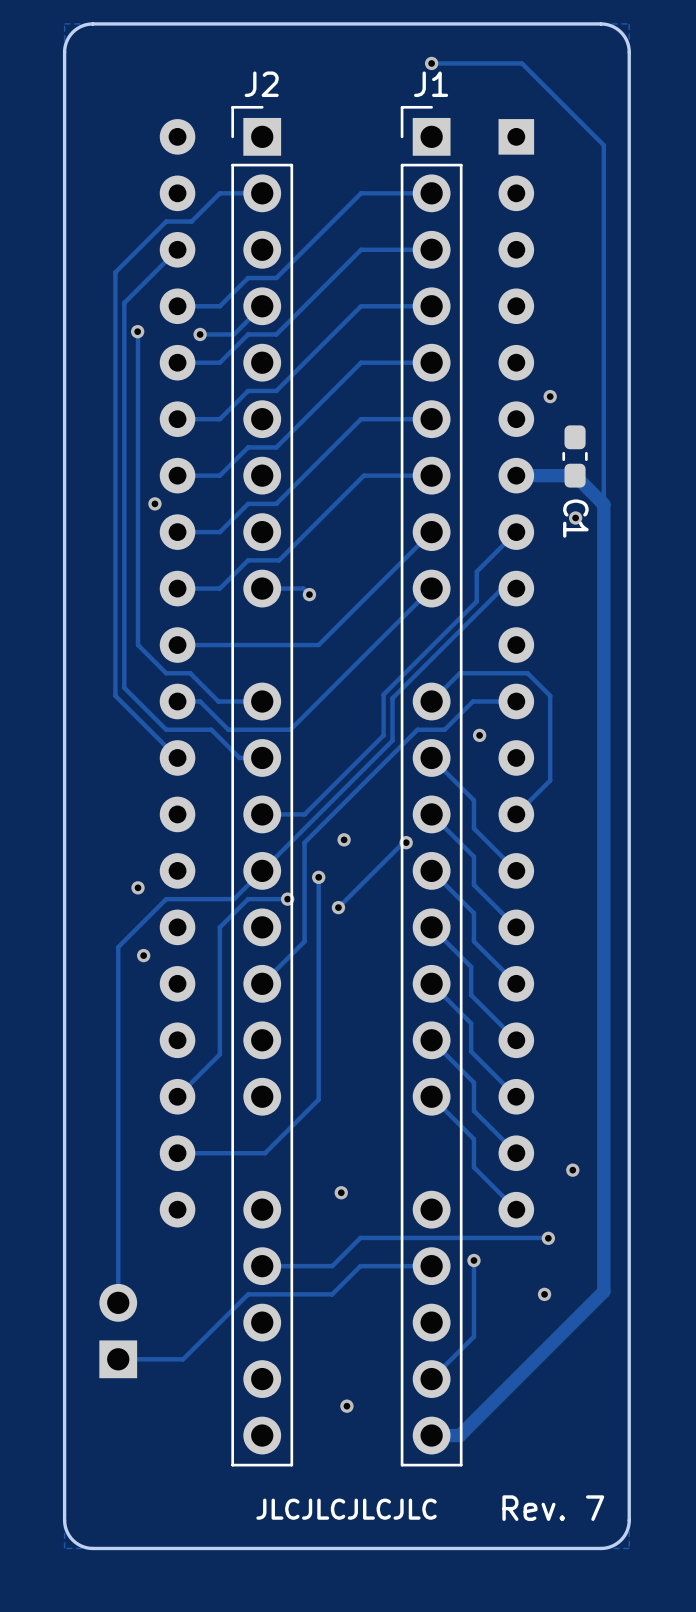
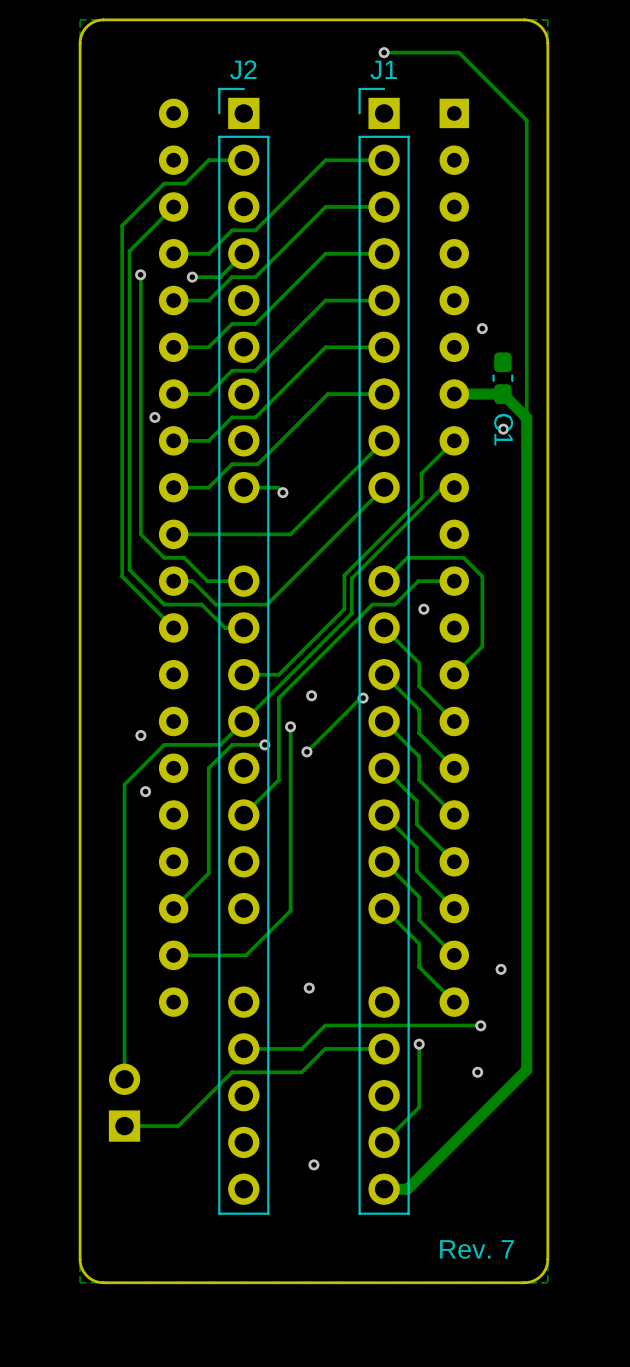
text: JLCJLCJLCJLC (346, 1509) -> none

